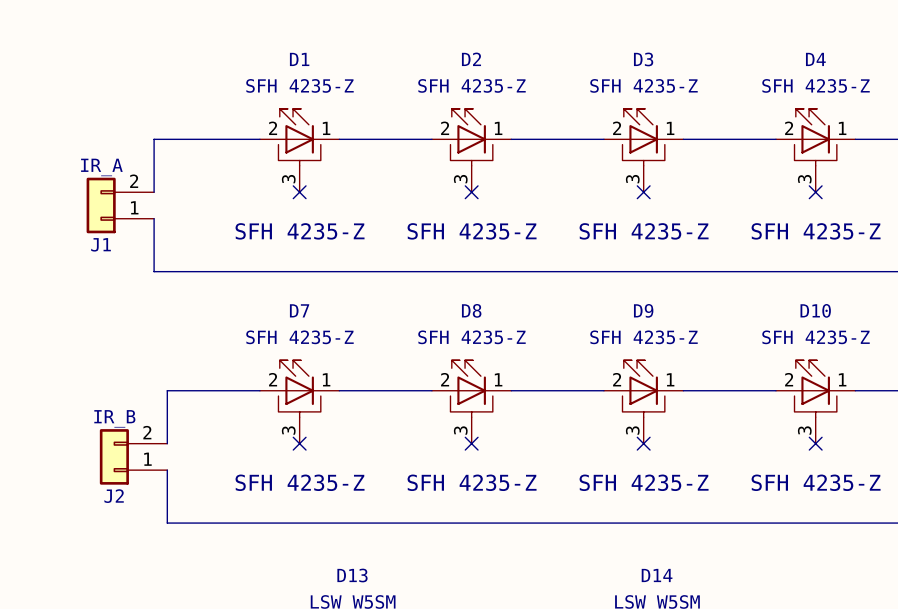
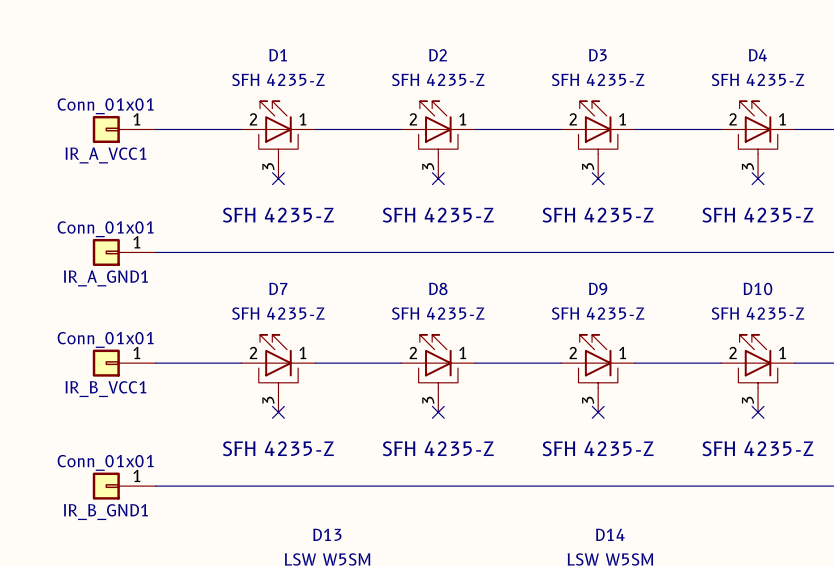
IR_A_VCC1: none -> Conn_01x01 (124, 129)
wire: (167, 139) (154, 139) (154, 192) -> none
J1: IR_A (120, 205) -> none
wire: (154, 218) (154, 271) (167, 271) -> none
IR_A_GND1: none -> Conn_01x01 (124, 252)
IR_B_VCC1: none -> Conn_01x01 (124, 363)
wire: (167, 390) (167, 443) -> none
J2: IR_B (133, 456) -> none
wire: (167, 470) (167, 523) -> none
IR_B_GND1: none -> Conn_01x01 (124, 486)

